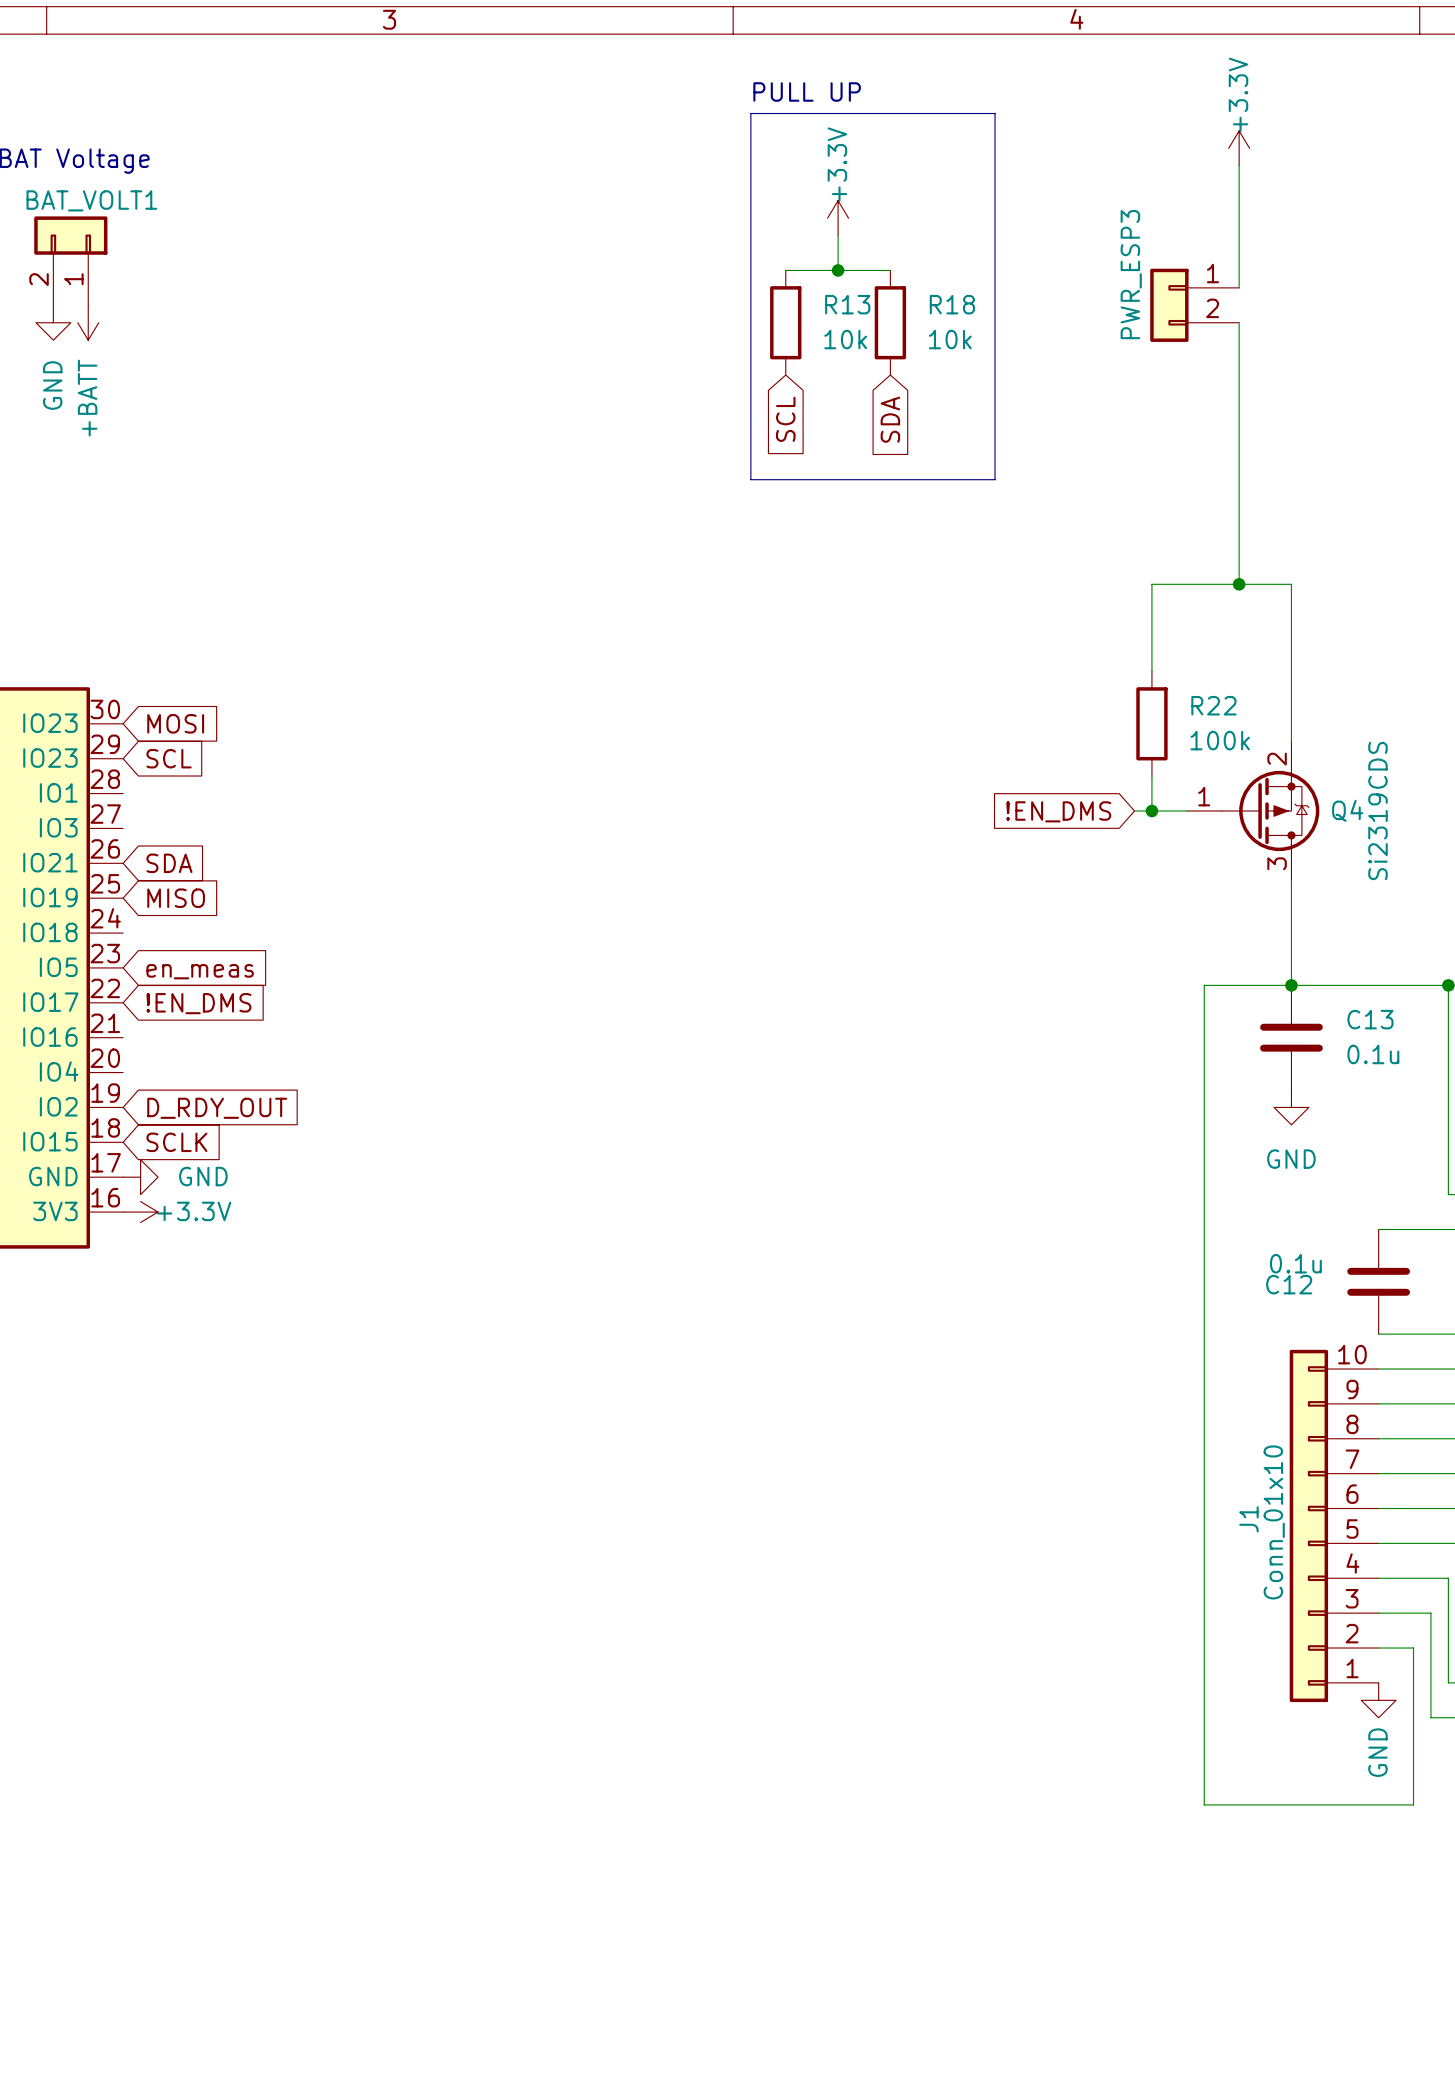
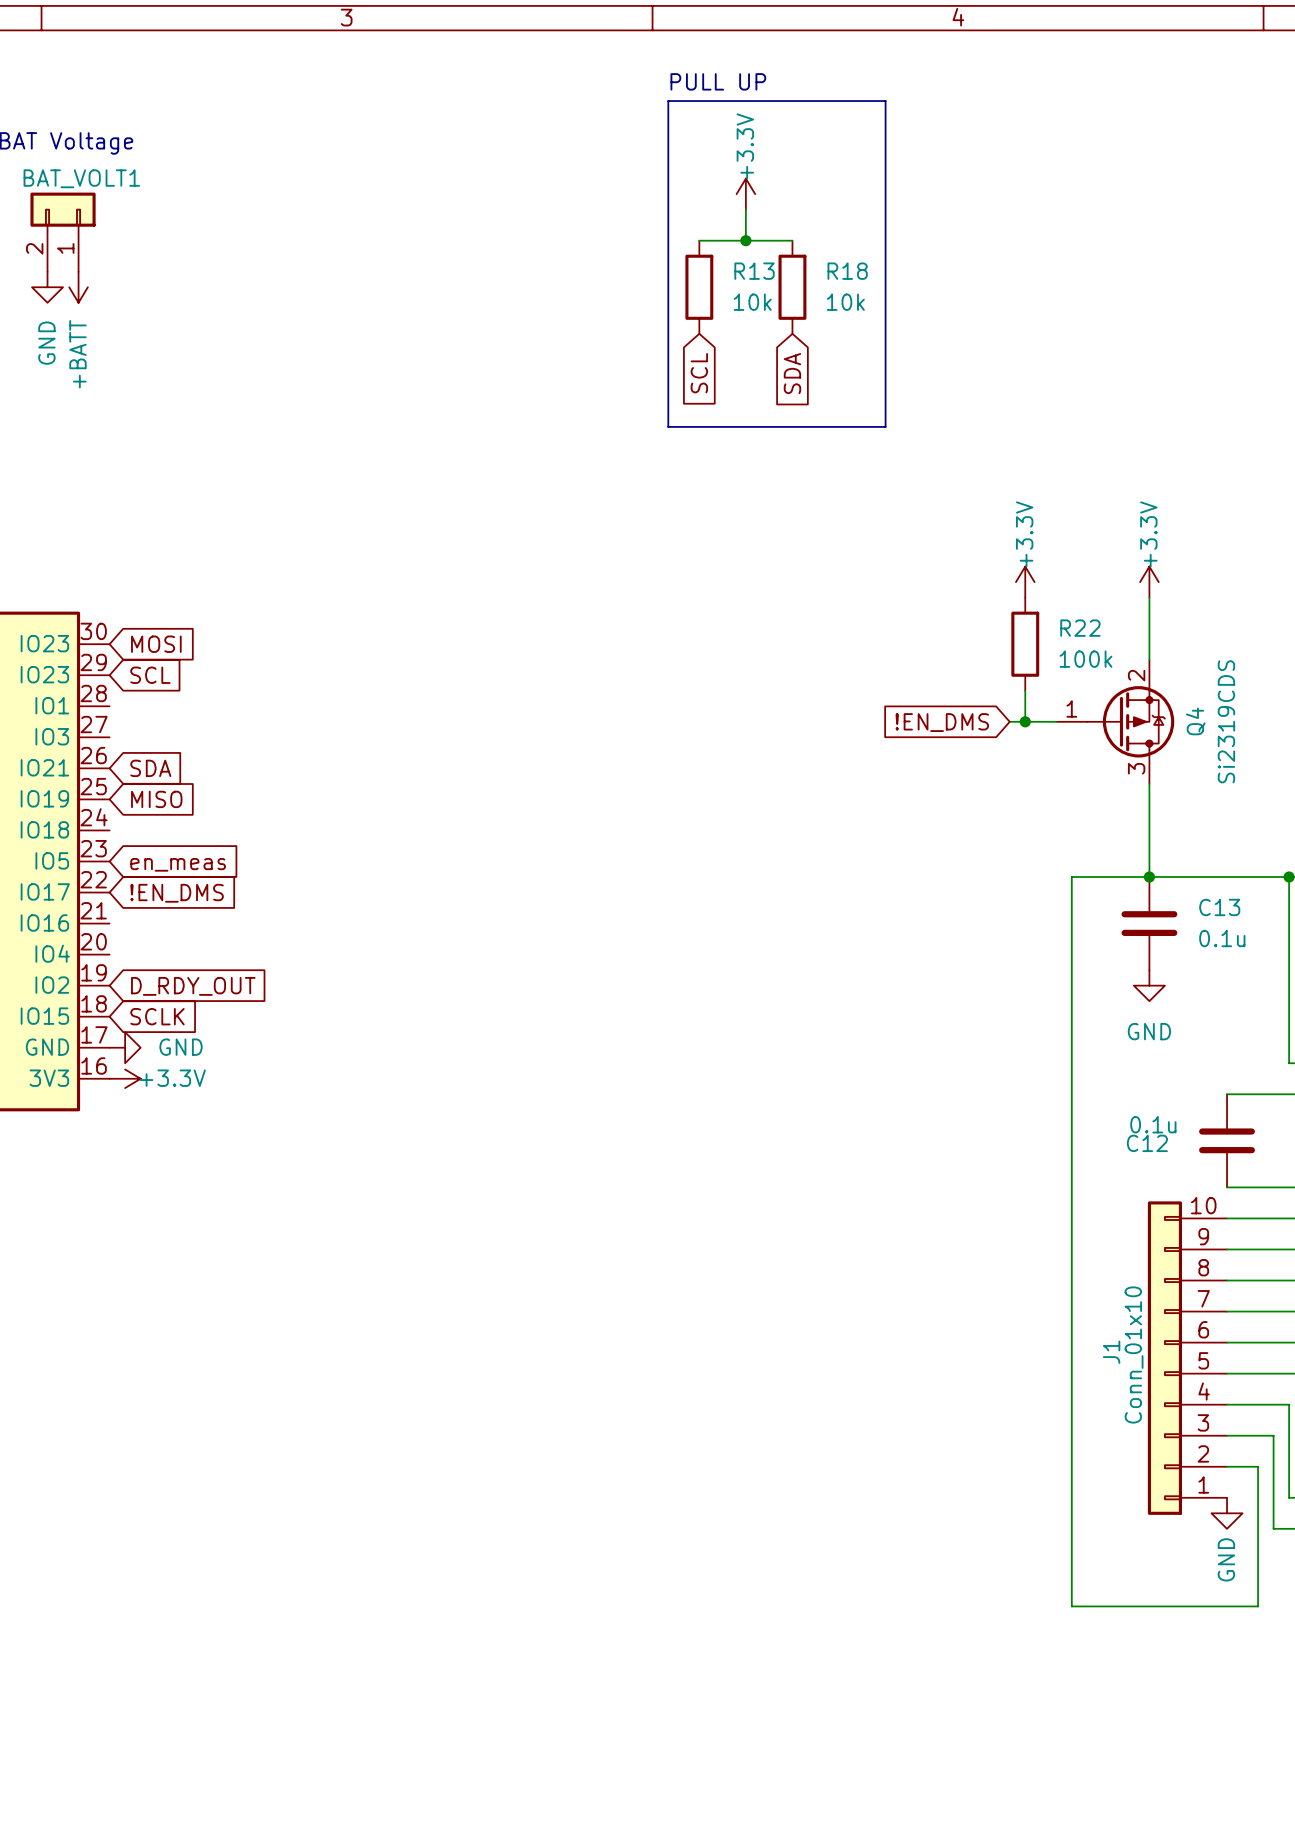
power symbol: +3.3V (1239, 148) -> none
wire: (1239, 165) (1239, 287) -> none
PWR_ESP3: (1194, 305) -> none
wire: (1239, 322) (1239, 584) -> none
junction: (1239, 584) -> none
power symbol: none -> +3.3V (1025, 582)
power symbol: none -> +3.3V (1149, 582)
wire: (1151, 671) (1151, 584) (1291, 584) (1291, 671) -> none
Q4 name rotation: 0° (1347, 810) -> 90° counterclockwise (1195, 721)

